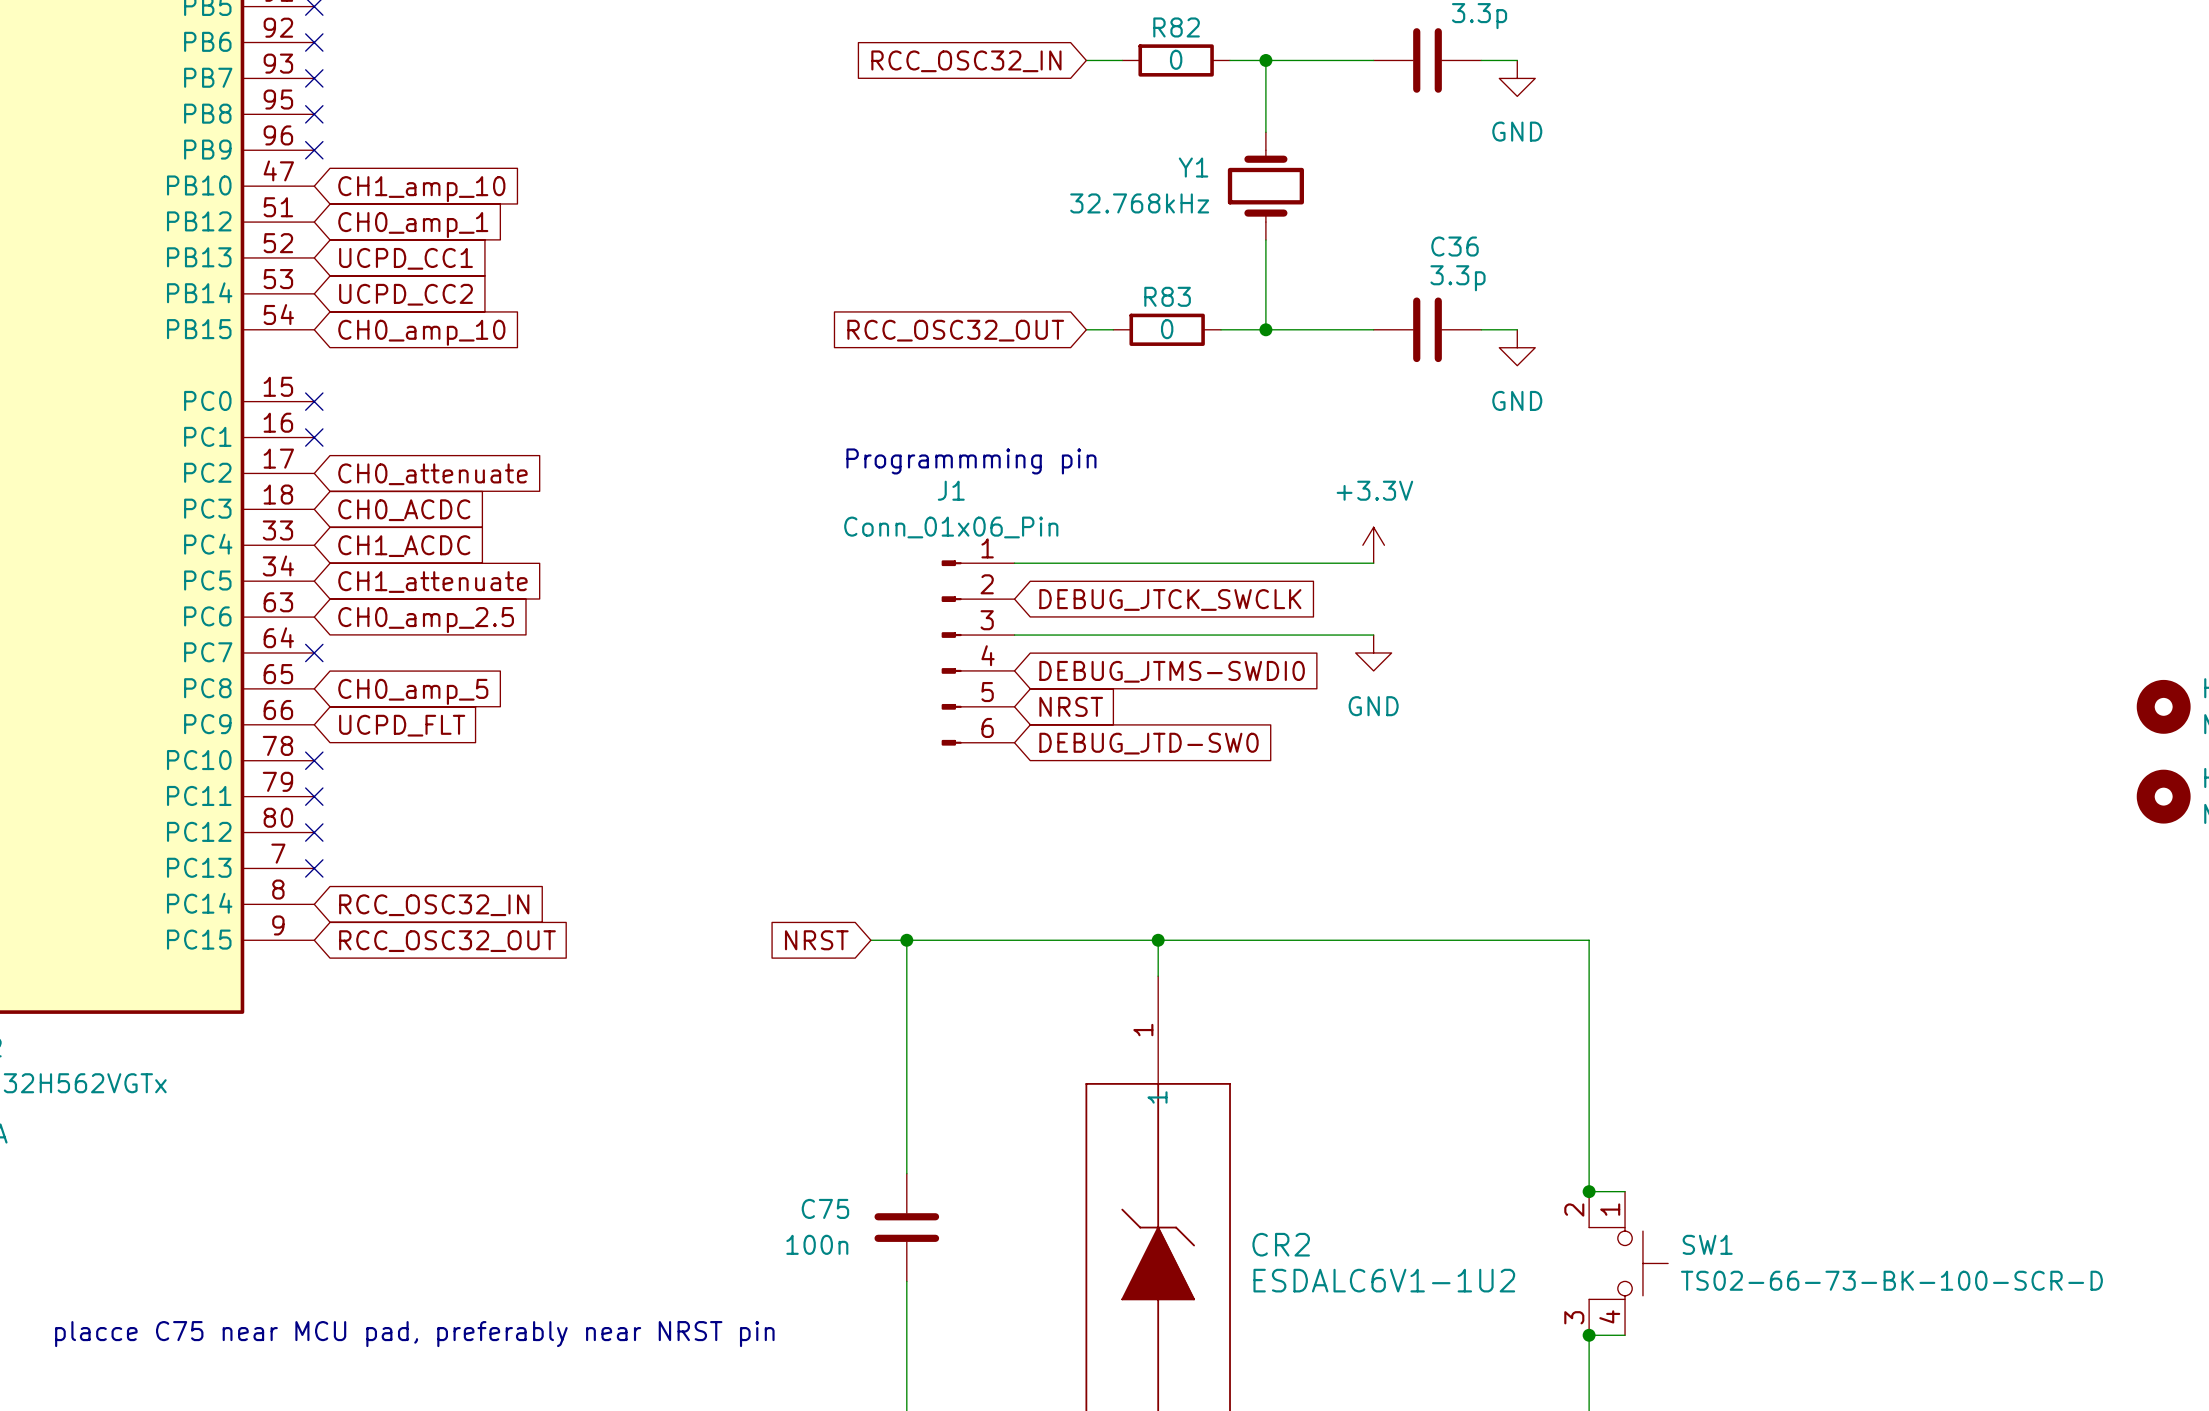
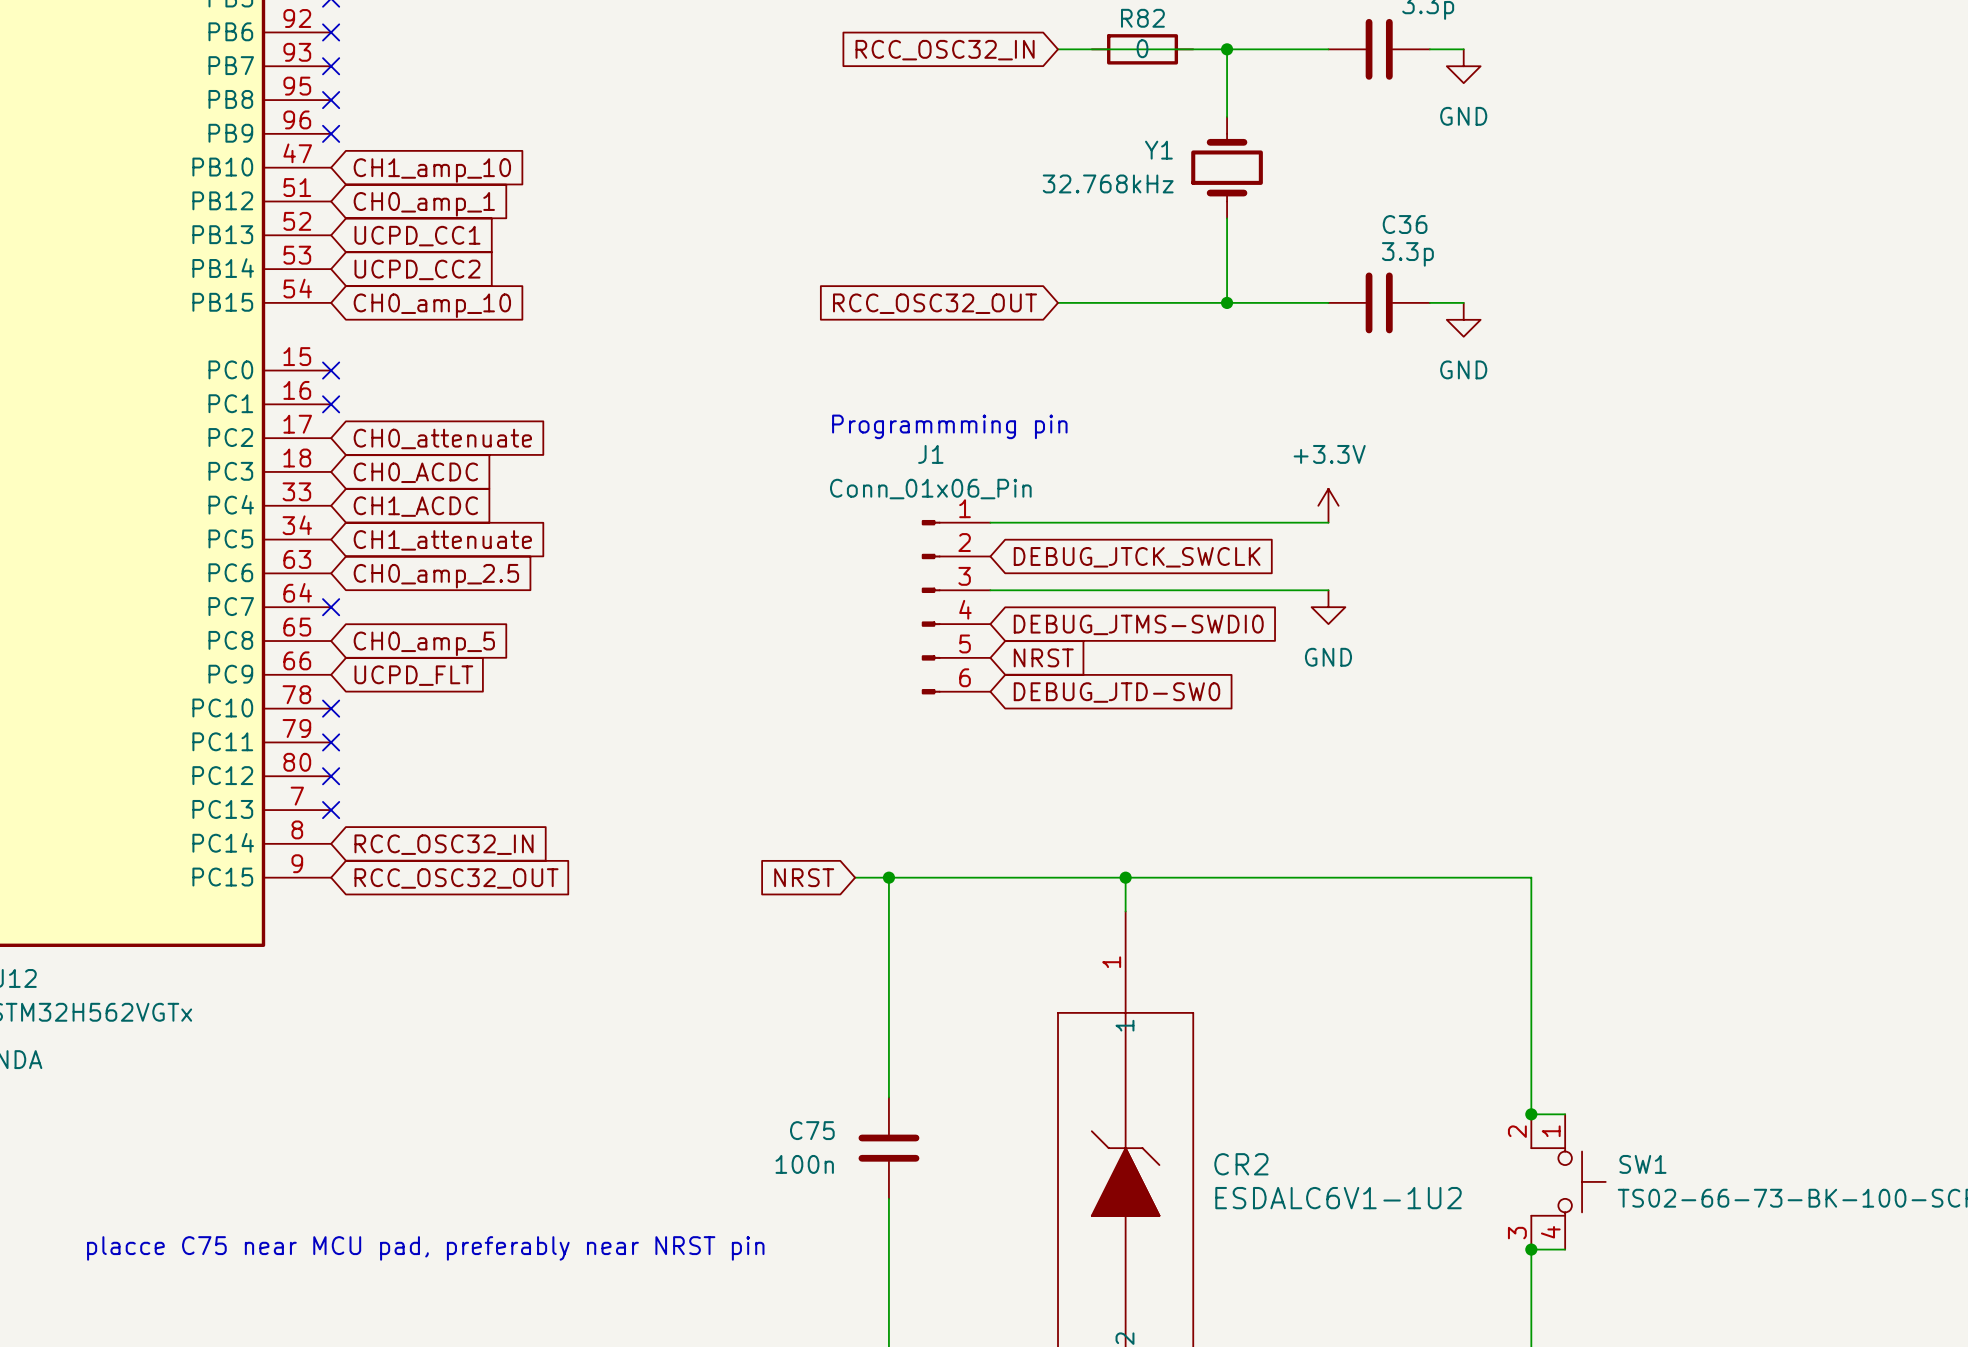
wire: none -> (1091, 49) (1193, 49)
wire: none -> (1083, 302) (1184, 302)
R83: 0 (1167, 329) -> none

